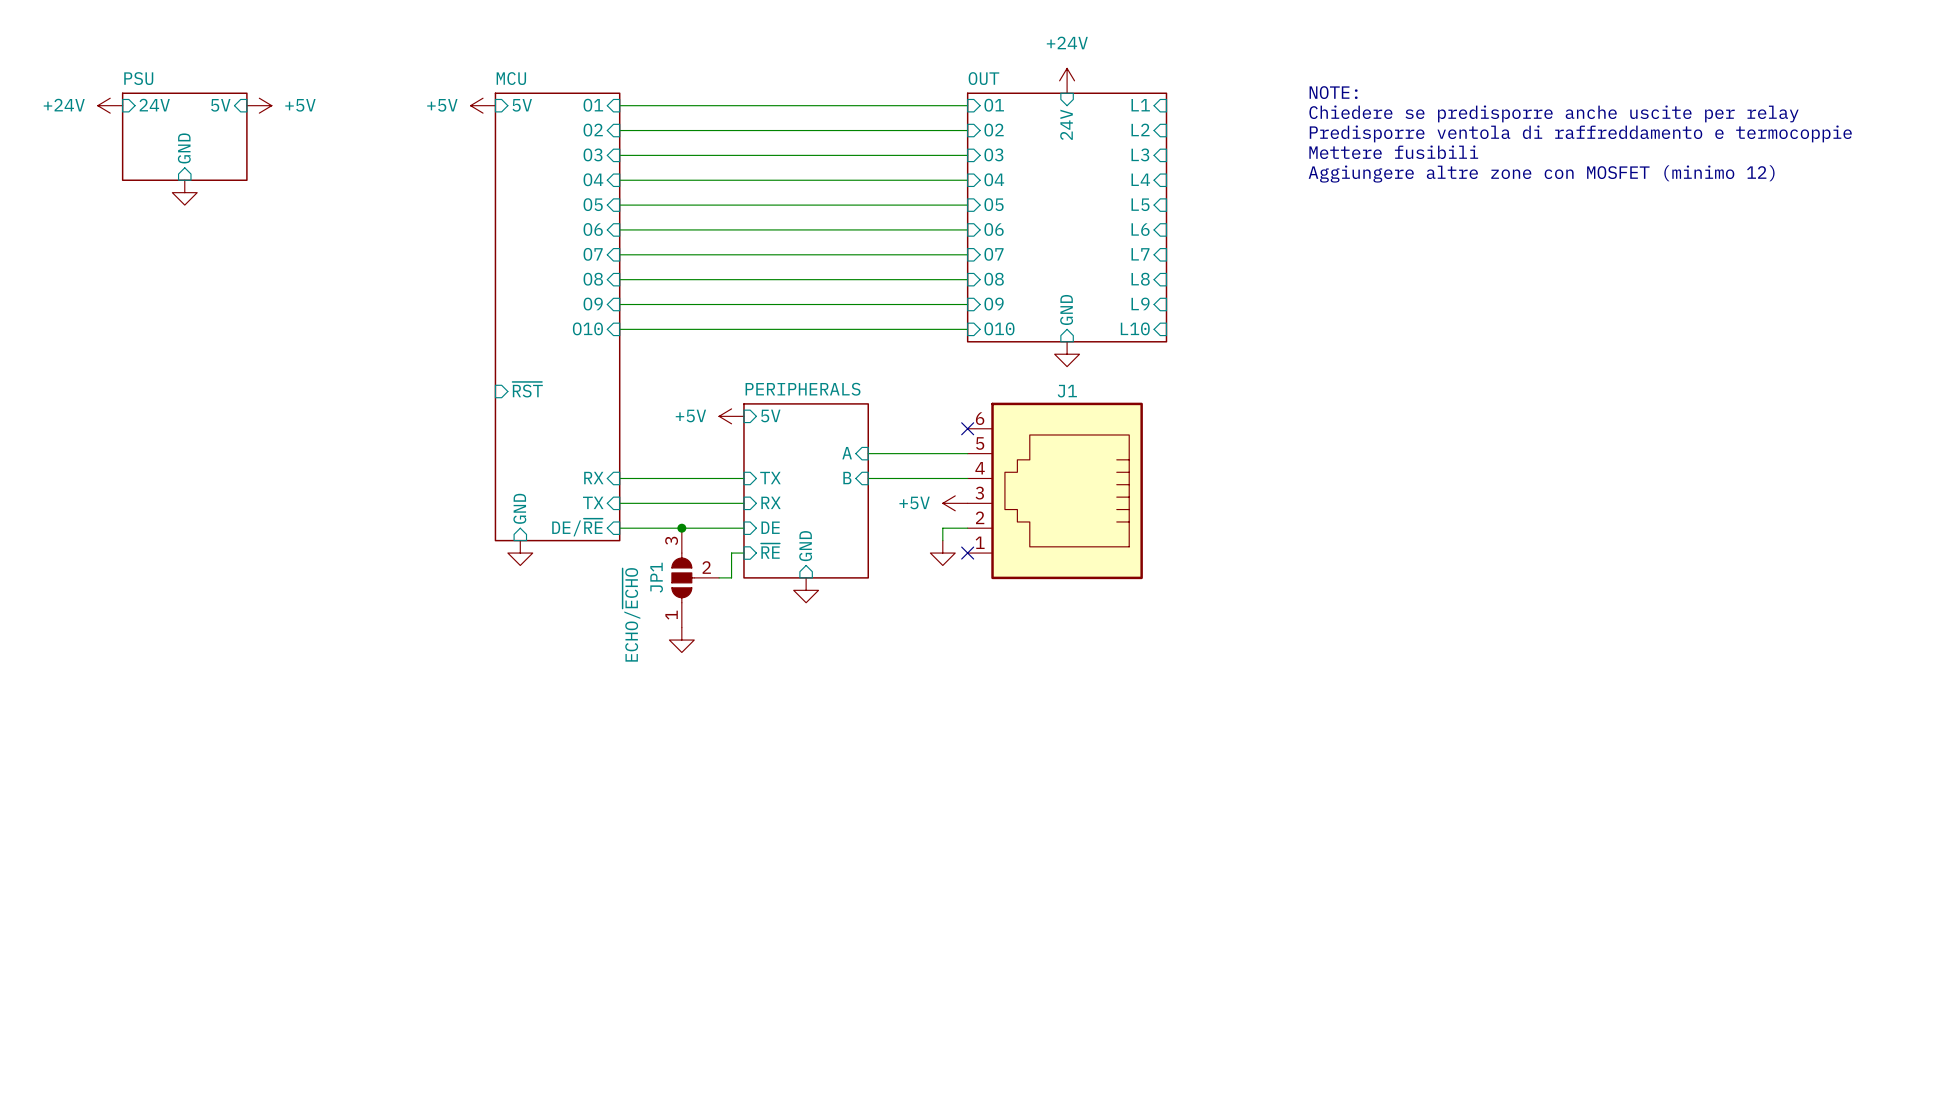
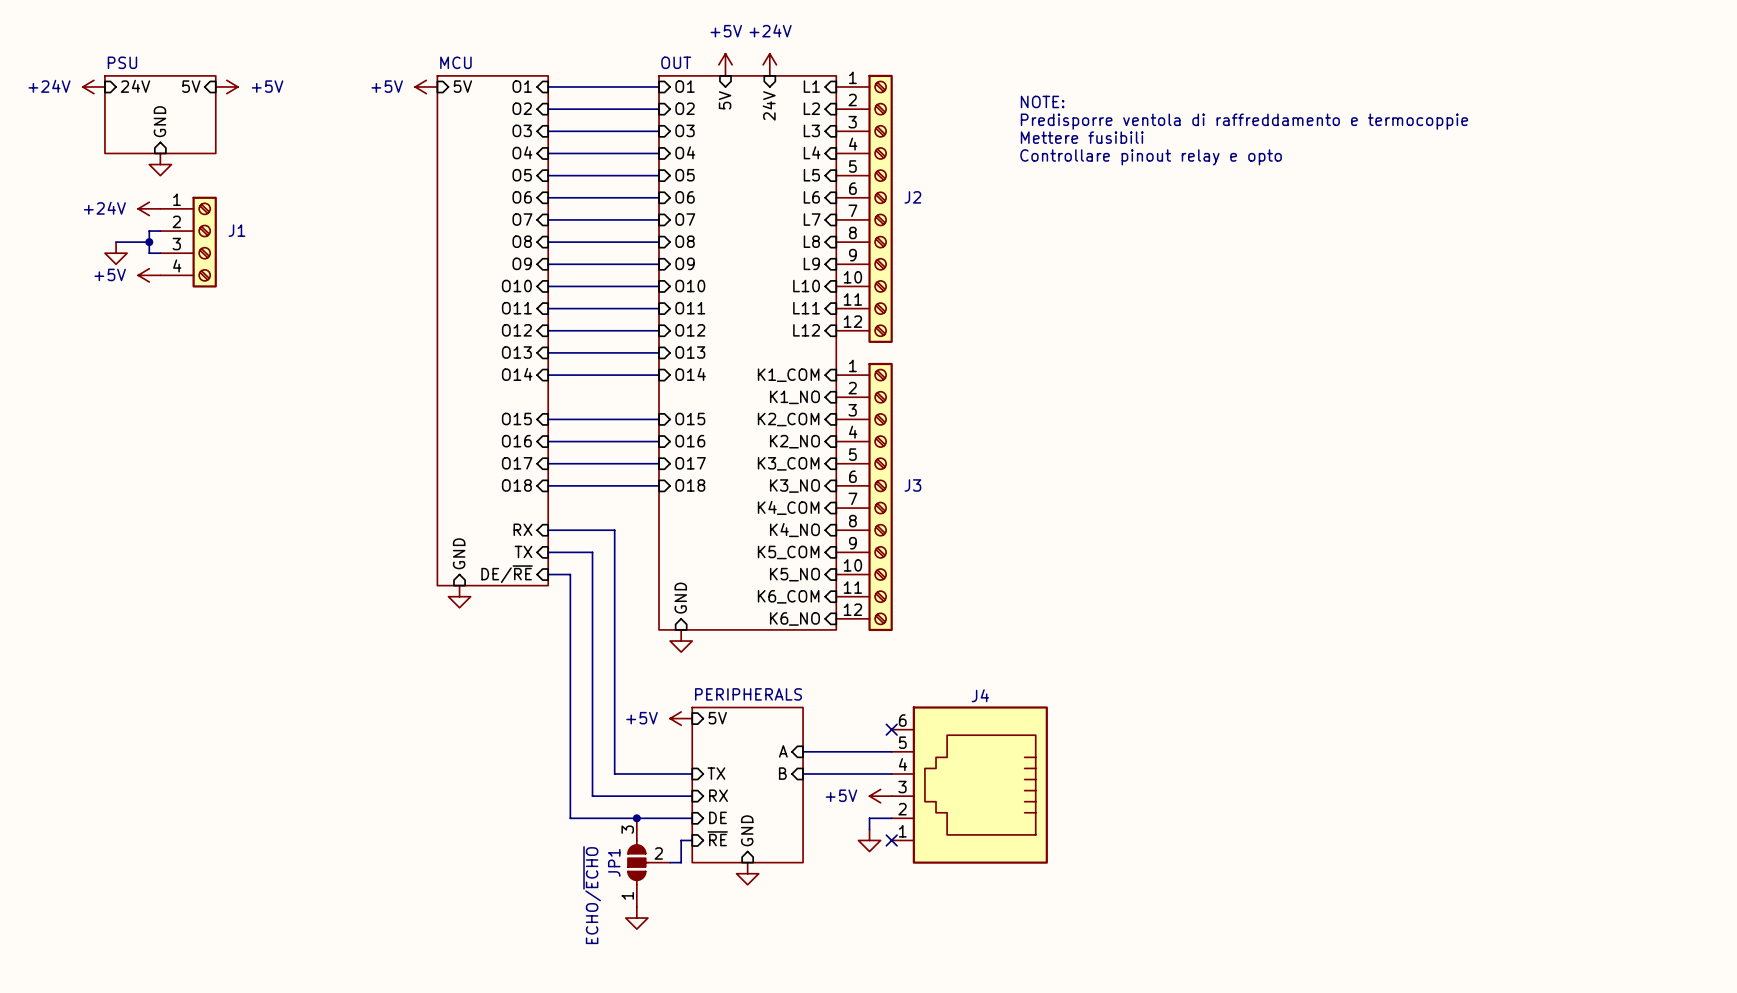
power symbol: none -> +5V (725, 64)
power symbol position: +24V (1067, 80) -> +24V (769, 64)
text position: NOTE: (1333, 92) -> NOTE: (1042, 101)
wire: (743, 105) (967, 105) -> none
sheet pin position: O1 (994, 105) -> O1 (685, 86)
sheet pin position: L1 (1140, 105) -> L1 (811, 86)
text: Chiedere se predisporre anche uscite per relay (1554, 113) -> none
sheet pin: none -> 5V (725, 100)
sheet pin position: 24V (1066, 124) -> 24V (769, 105)
sheet pin position: L2 (1140, 129) -> L2 (811, 108)
wire: (743, 130) (967, 130) -> none
sheet pin position: O2 (994, 130) -> O2 (685, 108)
text position: Predisporre ventola di raffreddamento e termocoppie (1580, 133) -> Predisporre ventola di raffreddamento e termocoppie (1244, 121)
text position: Mettere fusibili (1393, 152) -> Mettere fusibili (1082, 137)
sheet pin position: O3 (993, 154) -> O3 (685, 130)
sheet pin position: L3 (1140, 154) -> L3 (811, 130)
wire: (743, 155) (967, 155) -> none
text: Aggiungere altre zone con MOSFET (minimo 12) (1541, 173) -> none
sheet pin position: O4 (994, 179) -> O4 (685, 152)
sheet pin position: L4 (1140, 179) -> L4 (812, 152)
wire: (743, 180) (967, 180) -> none
text: none -> Controllare pinout relay e opto (1151, 157)
sheet pin position: O5 (994, 204) -> O5 (685, 175)
sheet pin position: L5 (1140, 204) -> L5 (811, 175)
wire: (743, 205) (967, 205) -> none
sheet OUT: (1067, 217) -> none
wire: (743, 229) (967, 229) -> none
sheet pin position: O6 (994, 229) -> O6 (685, 197)
sheet pin position: L6 (1140, 229) -> L6 (811, 197)
power symbol: none -> +24V (149, 208)
J2: none -> (864, 208)
wire: (743, 254) (967, 254) -> none
sheet pin position: O7 (994, 254) -> O7 (685, 219)
sheet pin position: L7 (1140, 254) -> L7 (812, 219)
wire: none -> (160, 231) (149, 231) (149, 253) (160, 253)
wire: none -> (116, 242) (149, 242)
junction: none -> (149, 242)
wire: (743, 279) (967, 279) -> none
sheet pin position: O8 (994, 279) -> O8 (685, 241)
sheet pin position: L8 (1140, 279) -> L8 (811, 241)
power symbol: none -> (116, 253)
sheet pin position: L9 (1140, 303) -> L9 (811, 263)
wire: (743, 304) (967, 304) -> none
sheet pin position: O9 (994, 304) -> O9 (685, 263)
sheet pin: GND (1066, 309) -> none
power symbol: none -> +5V (149, 275)
sheet MCU: (557, 316) -> none
sheet pin position: O10 (999, 328) -> O10 (690, 286)
sheet pin position: L10 (1135, 328) -> L10 (806, 286)
wire: (743, 329) (967, 329) -> none
sheet pin: none -> O11 (516, 308)
sheet pin: none -> O11 (690, 308)
sheet pin: none -> L11 (806, 308)
wire: none -> (548, 308) (659, 308)
power symbol: (1067, 354) -> none
sheet pin: none -> O12 (516, 330)
sheet pin: none -> O12 (690, 330)
sheet pin: none -> L12 (806, 330)
sheet MCU: none -> (492, 330)
wire: none -> (548, 330) (659, 330)
sheet pin: ~{RST} (527, 389) -> none
J1 name position: J1 (1067, 391) -> J1 (236, 230)
J1 symbol: [967, 402, 1143, 580] -> [160, 196, 217, 288]
sheet pin: none -> O13 (516, 352)
wire: none -> (548, 352) (659, 352)
sheet pin: none -> O13 (690, 352)
sheet OUT: none -> (747, 352)
sheet pin: 5V (770, 415) -> none
power symbol: +5V (731, 416) -> none
sheet pin: none -> O14 (517, 374)
wire: none -> (548, 375) (659, 375)
sheet pin: none -> O14 (690, 374)
no-connect mark: (967, 428) -> none
sheet pin: none -> K1_COM (788, 375)
sheet pin: A (847, 453) -> none
wire: (868, 453) (967, 453) -> none
sheet pin: none -> K1_NO (794, 397)
sheet pin: RX (593, 478) -> O15 (516, 418)
sheet pin: TX (770, 478) -> O15 (690, 418)
sheet pin: B (847, 478) -> none
wire: (868, 478) (967, 478) -> none
sheet pin: none -> K2_COM (788, 419)
sheet PERIPHERALS: (806, 490) -> none
sheet pin: TX (593, 502) -> O16 (516, 441)
sheet pin: RX (771, 502) -> O16 (690, 441)
power symbol: +5V (955, 503) -> none
sheet pin: none -> K2_NO (794, 441)
sheet pin position: GND (519, 508) -> GND (459, 553)
sheet pin: DE/~{RE} (577, 527) -> O17 (517, 463)
sheet pin: DE (770, 527) -> O17 (690, 463)
junction: (681, 528) -> none
sheet pin: none -> K3_COM (788, 463)
sheet pin position: GND (805, 546) -> GND (680, 598)
sheet pin: ~{RE} (770, 551) -> O18 (690, 485)
sheet pin: none -> O18 (516, 485)
power symbol: (520, 553) -> none
wire: (731, 553) (731, 577) (719, 577) -> (647, 485) (548, 485)
sheet pin: none -> K3_NO (794, 486)
power symbol: (942, 553) -> none
no-connect mark: (967, 553) -> none
J3: none -> (864, 496)
JP1 position: (695, 577) -> (649, 862)
sheet pin: none -> K4_COM (788, 507)
power symbol: (806, 590) -> none
sheet pin: none -> RX (522, 529)
wire: none -> (548, 530) (614, 530) (614, 773) (692, 773)
sheet pin: none -> K4_NO (794, 530)
sheet pin: none -> TX (523, 551)
wire: none -> (548, 552) (592, 552) (592, 796) (692, 796)
sheet pin: none -> K5_COM (788, 552)
power symbol: (681, 640) -> none
sheet pin: none -> DE/~{RE} (507, 574)
wire: none -> (548, 574) (570, 574) (570, 818) (692, 818)
sheet pin: none -> K5_NO (794, 574)
power symbol: none -> (459, 596)
sheet pin: none -> K6_COM (788, 596)
sheet pin: none -> K6_NO (794, 618)
power symbol: none -> (681, 641)
sheet pin: none -> 5V (717, 718)
power symbol: none -> +5V (681, 718)
no-connect mark: none -> (891, 729)
sheet pin: none -> A (783, 751)
wire: none -> (803, 751) (891, 751)
sheet pin: none -> TX (716, 773)
sheet pin: none -> B (782, 773)
wire: none -> (803, 773) (891, 773)
sheet PERIPHERALS: none -> (747, 785)
J4: none -> (969, 785)
sheet pin: none -> RX (718, 795)
power symbol: none -> +5V (880, 796)
junction: none -> (636, 818)
sheet pin: none -> DE (718, 817)
wire: none -> (891, 818) (869, 818) (869, 829)
sheet pin: none -> GND (747, 830)
sheet pin: none -> ~{RE} (717, 838)
wire: none -> (692, 840) (681, 840) (681, 862) (670, 862)
power symbol: none -> (869, 840)
no-connect mark: none -> (891, 840)
power symbol: none -> (747, 873)
power symbol: none -> (636, 918)

